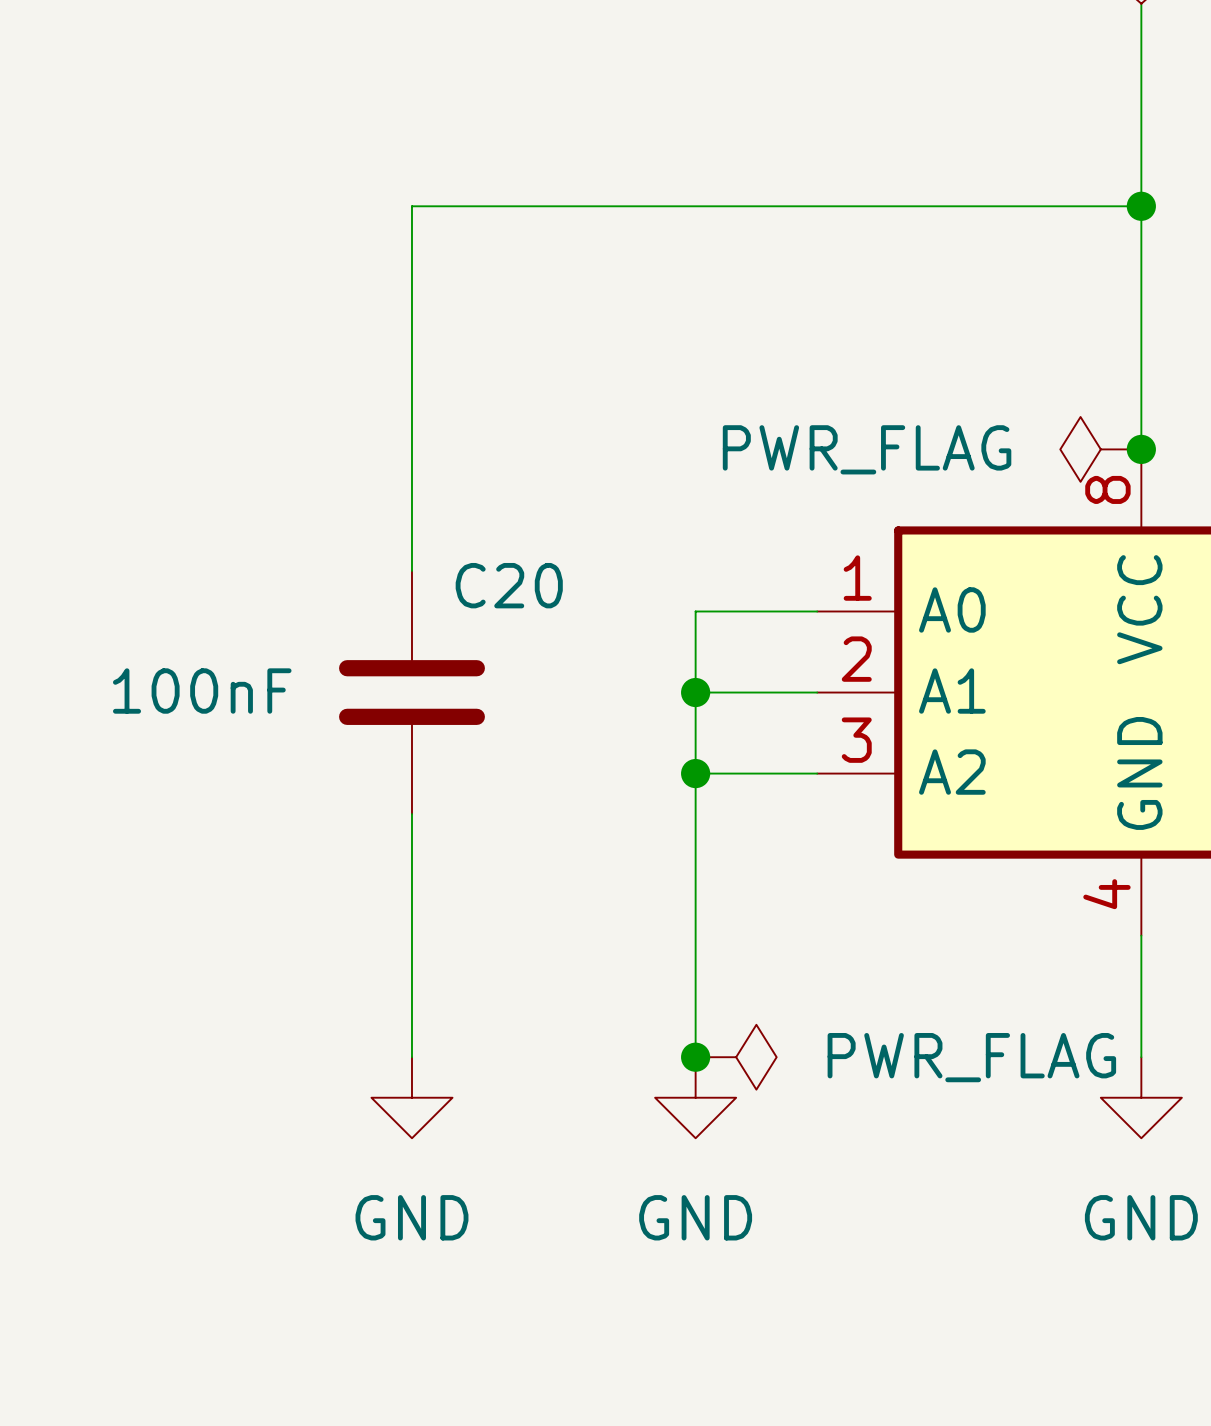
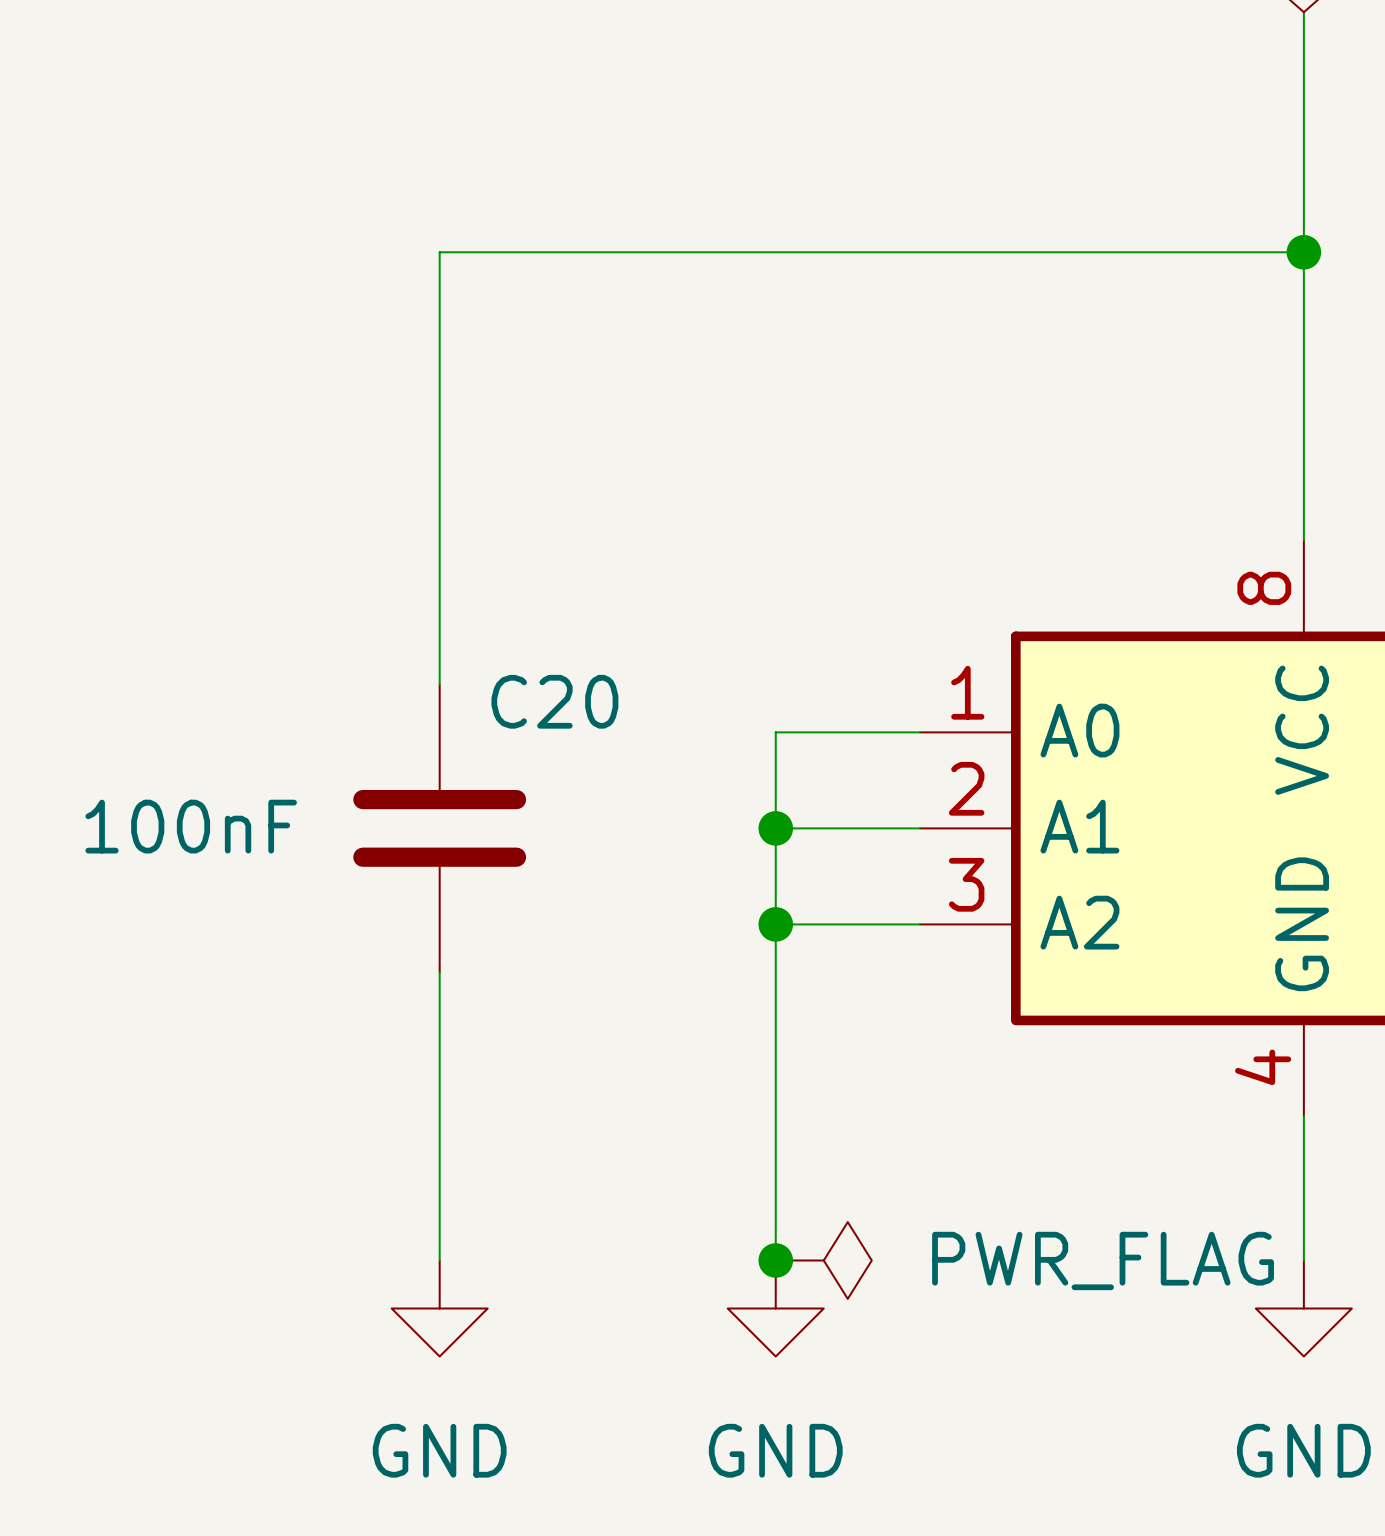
power symbol: PWR_FLAG (1100, 449) -> none
junction: (1141, 449) -> none

